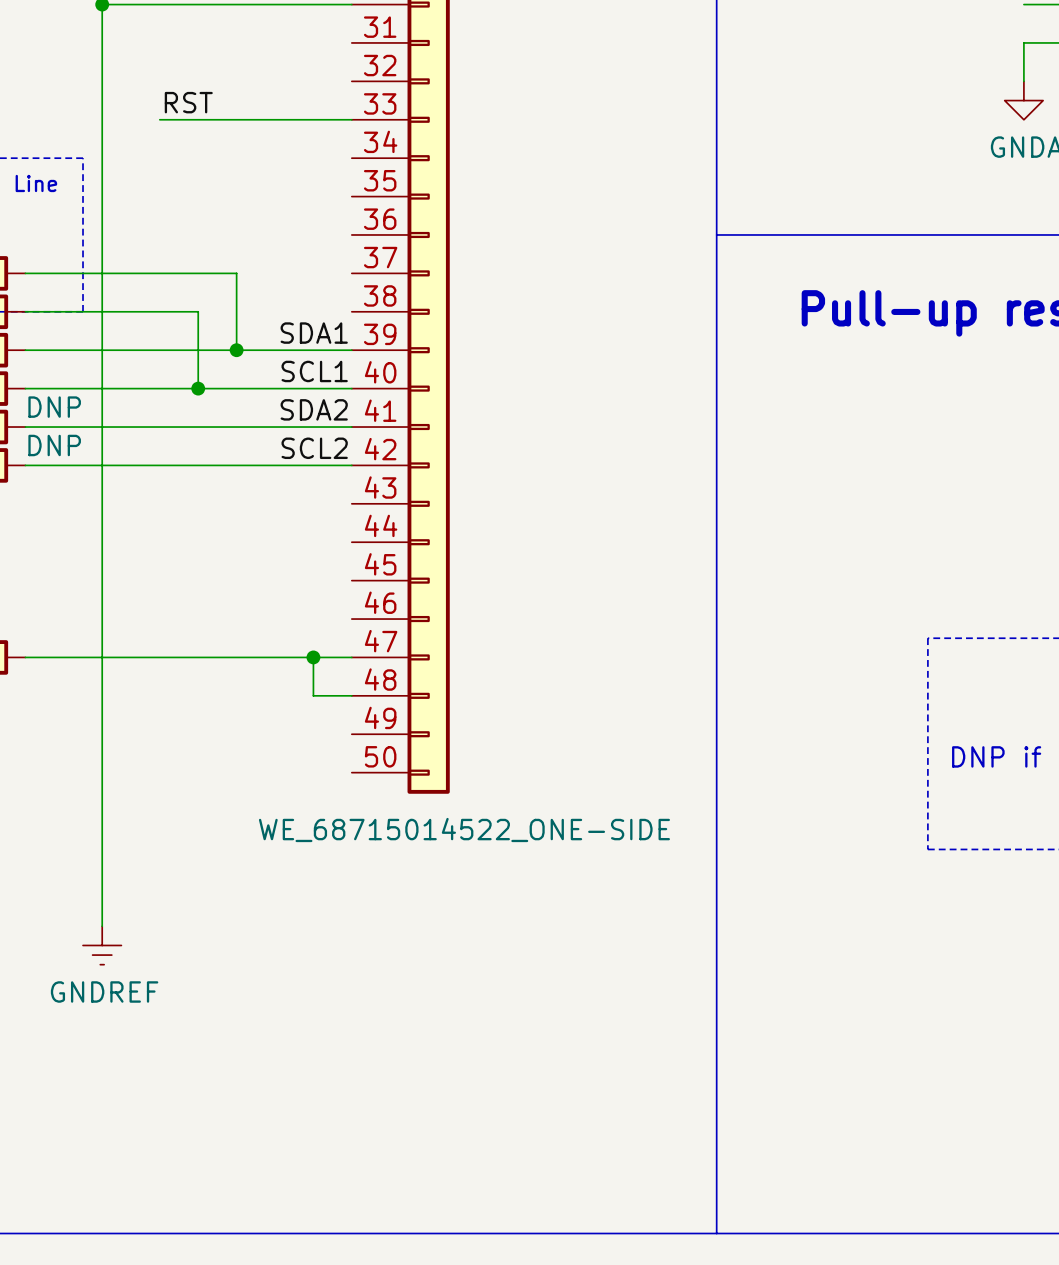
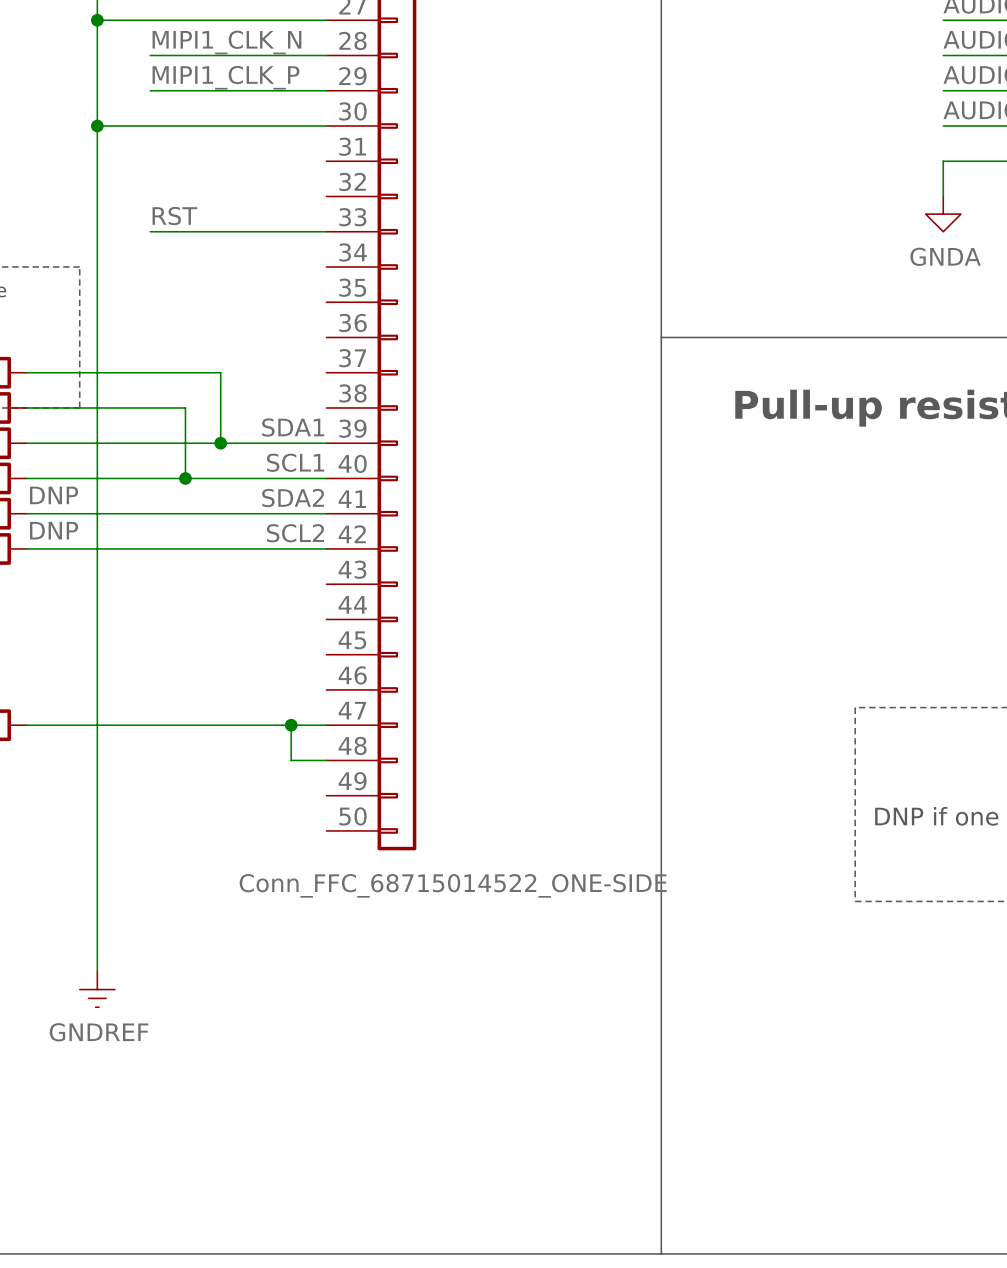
part value: WE_68715014522_ONE-SIDE (464, 829) -> Conn_FFC_68715014522_ONE-SIDE (453, 885)

